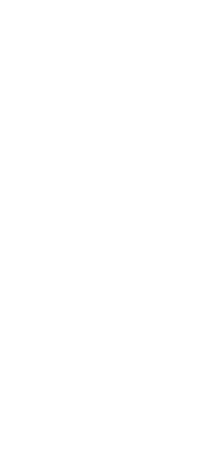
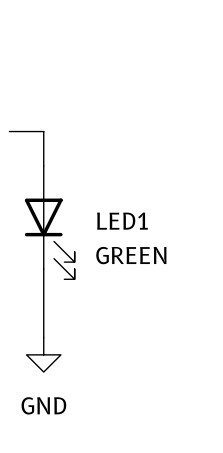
wire: none -> (9, 131) (43, 131) (43, 165)
LED1: none -> GREEN (49, 222)
wire: none -> (43, 268) (43, 337)
power symbol: none -> GND (43, 354)

